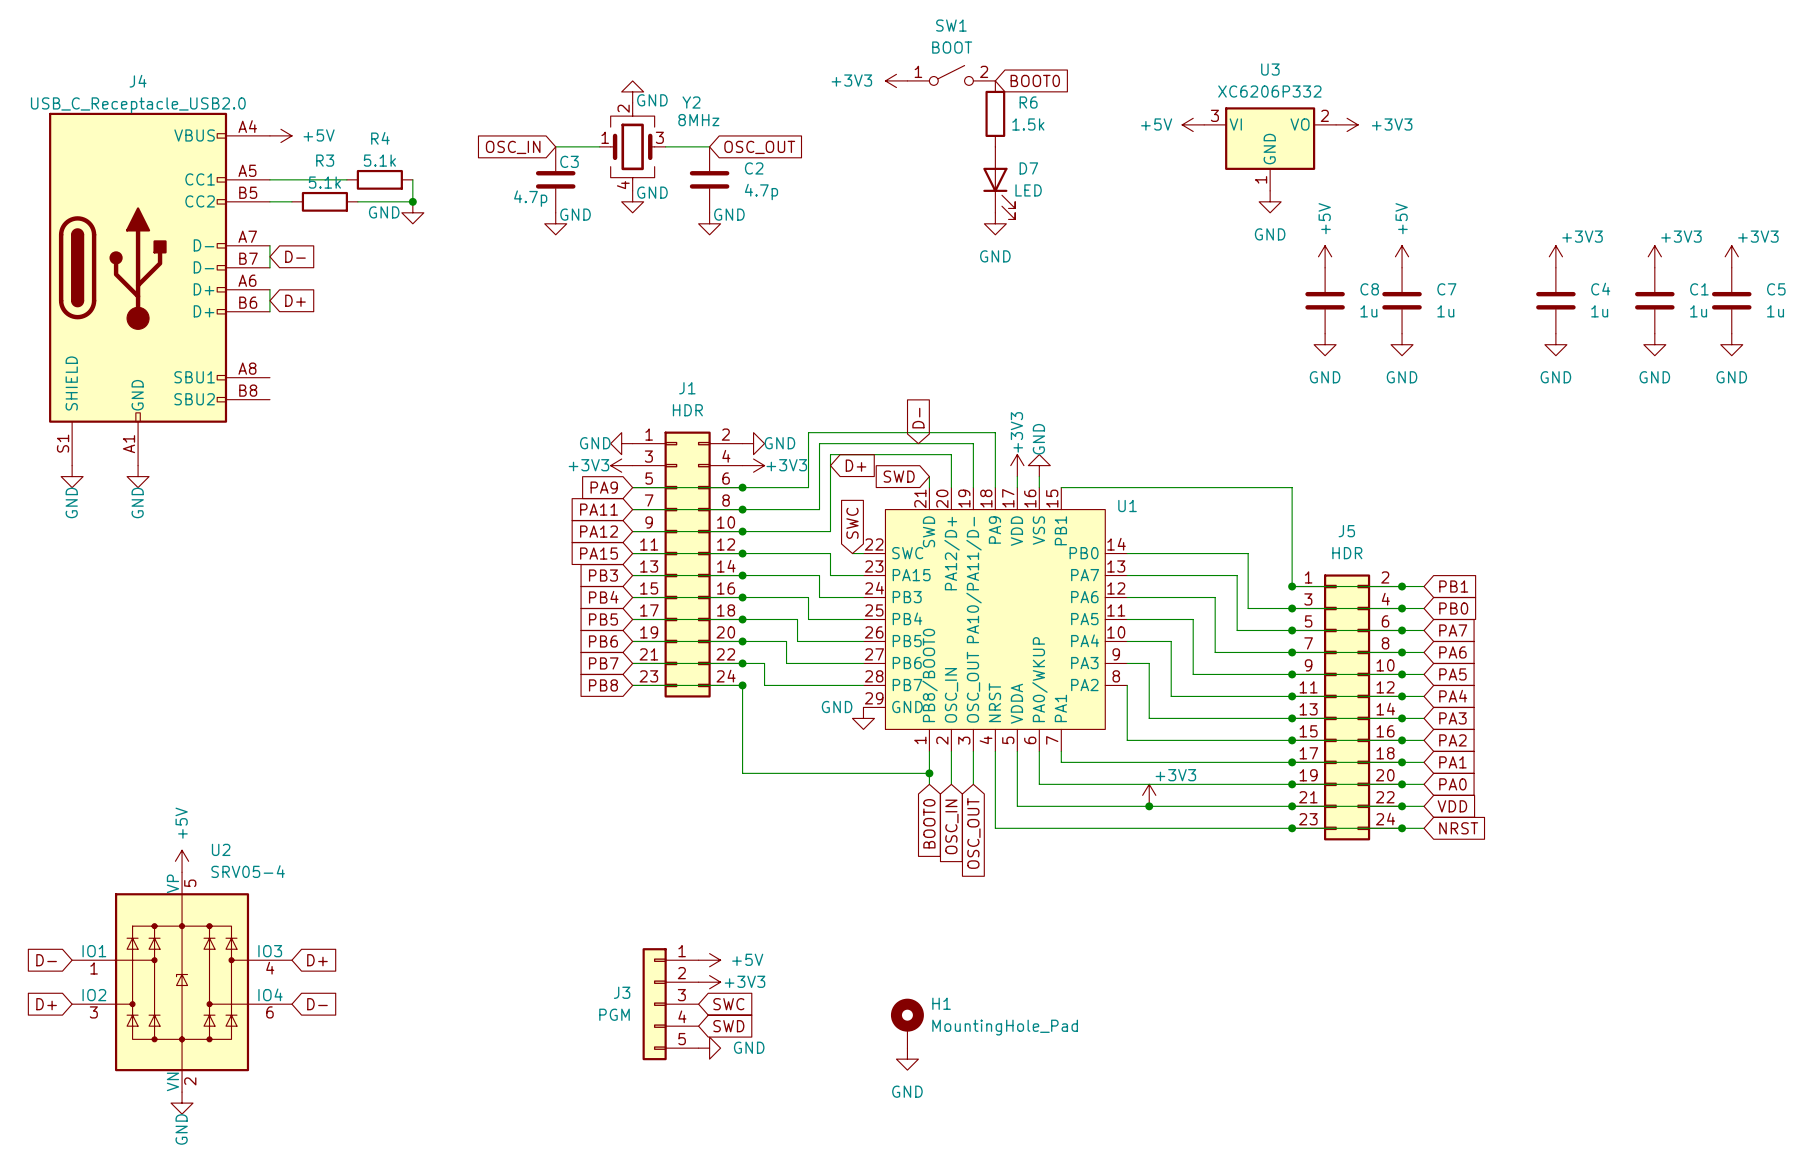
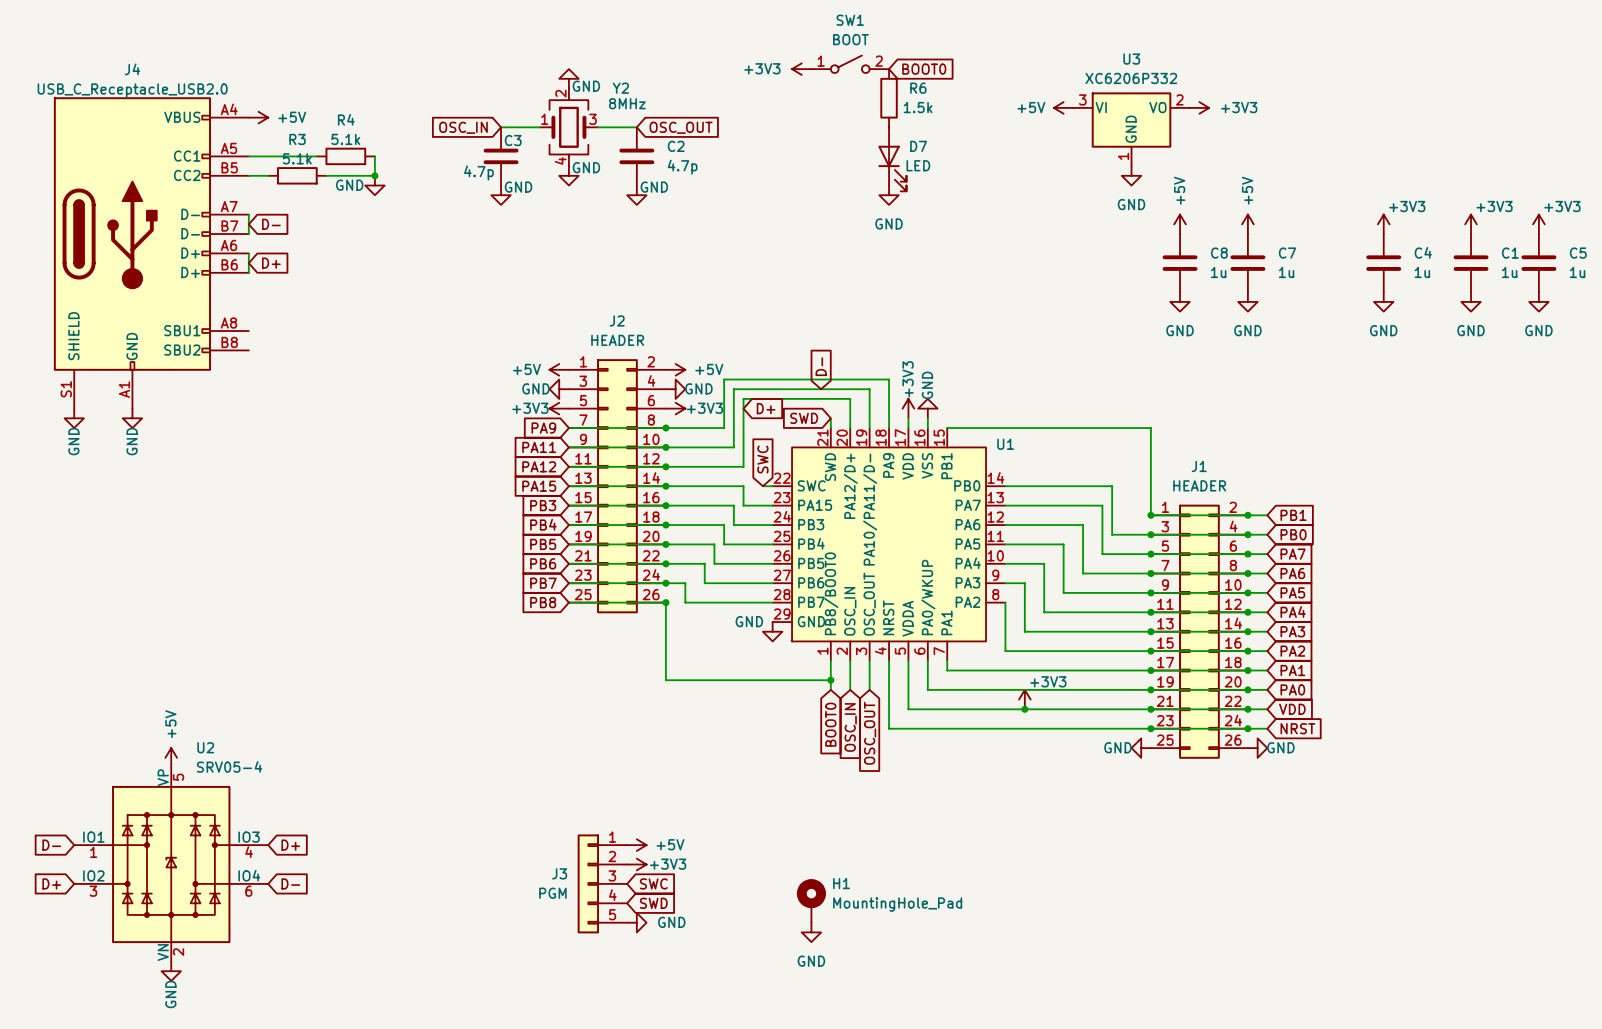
J1 value: HDR (687, 410) -> HEADER (1199, 485)
power symbol: none -> +5V (559, 369)
power symbol: none -> +5V (675, 369)
J1 symbol: [632, 431, 743, 698] -> [1150, 504, 1248, 759]
J2: none -> HEADER (617, 486)
J5: HDR (1347, 707) -> none
power symbol: none -> GND (1141, 748)
power symbol: none -> GND (1257, 748)

